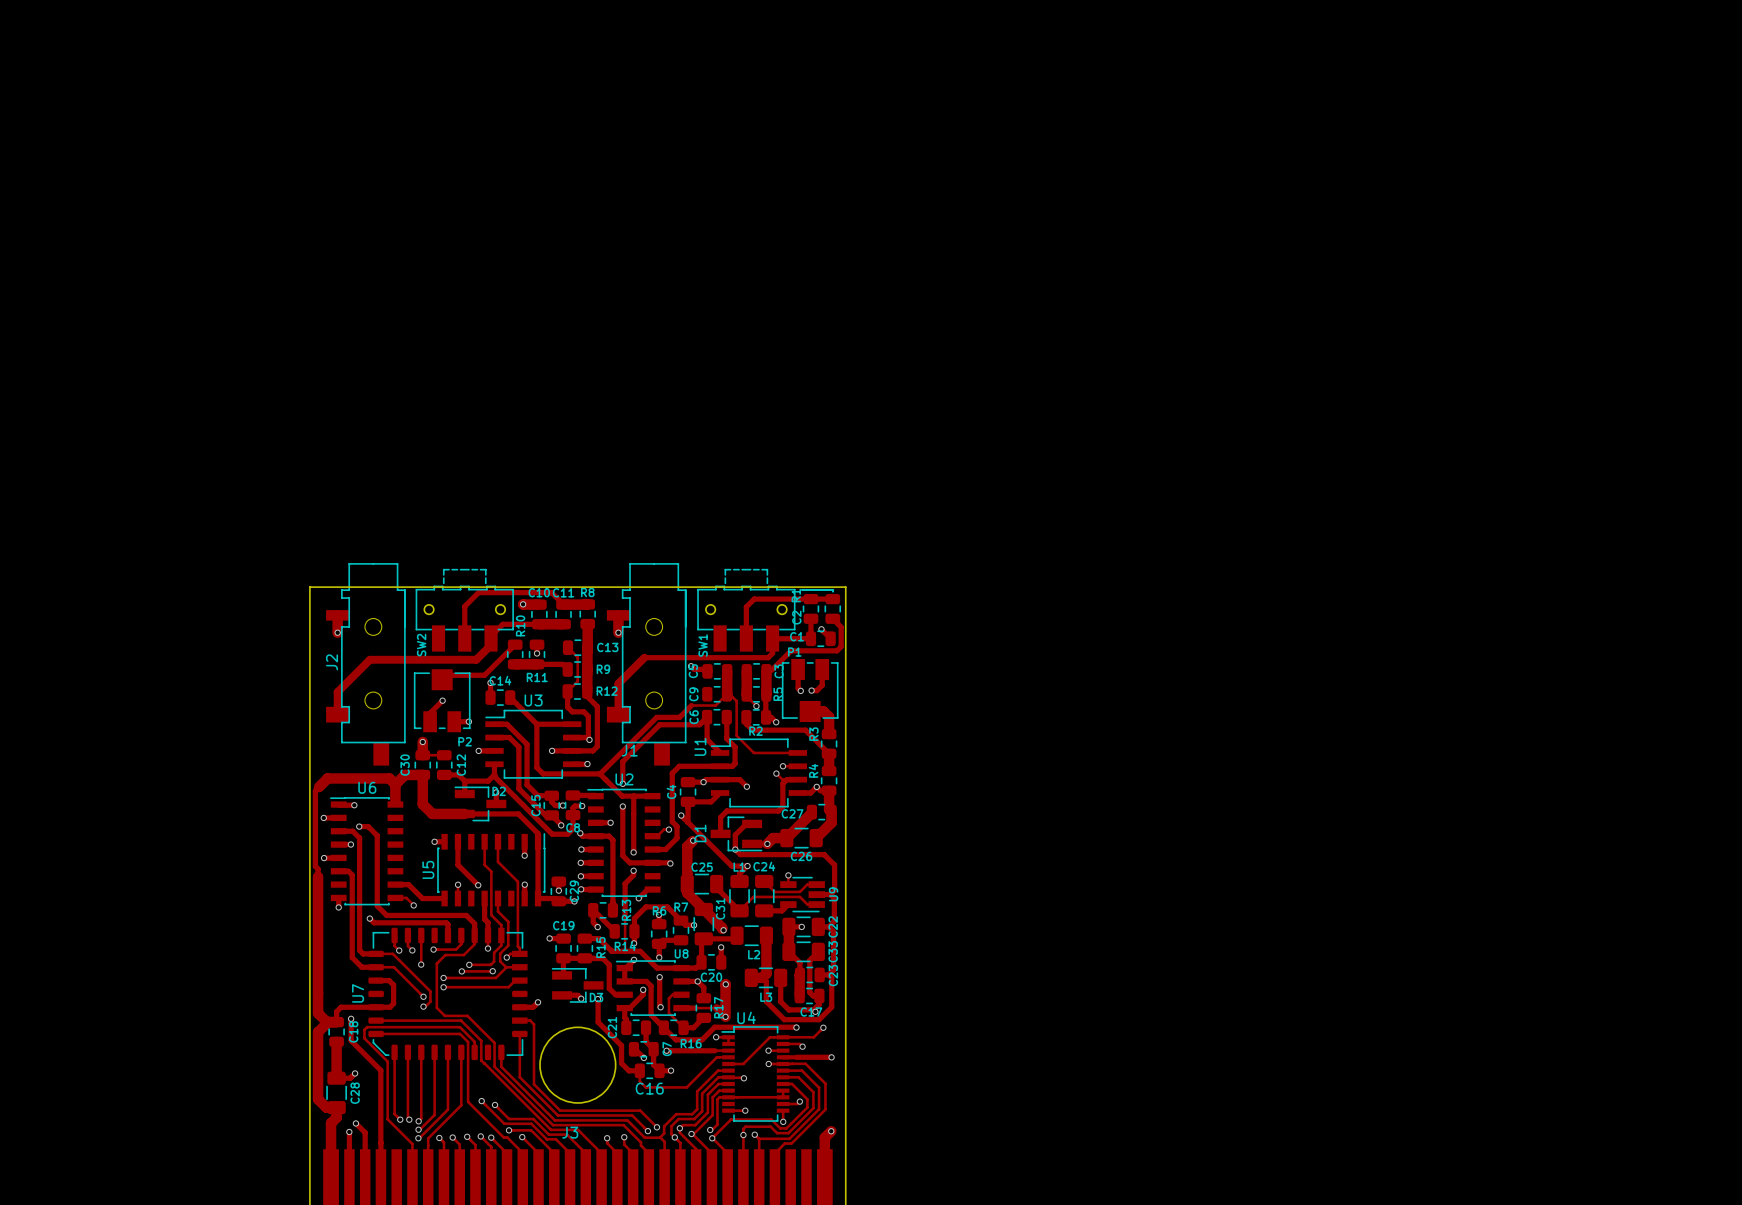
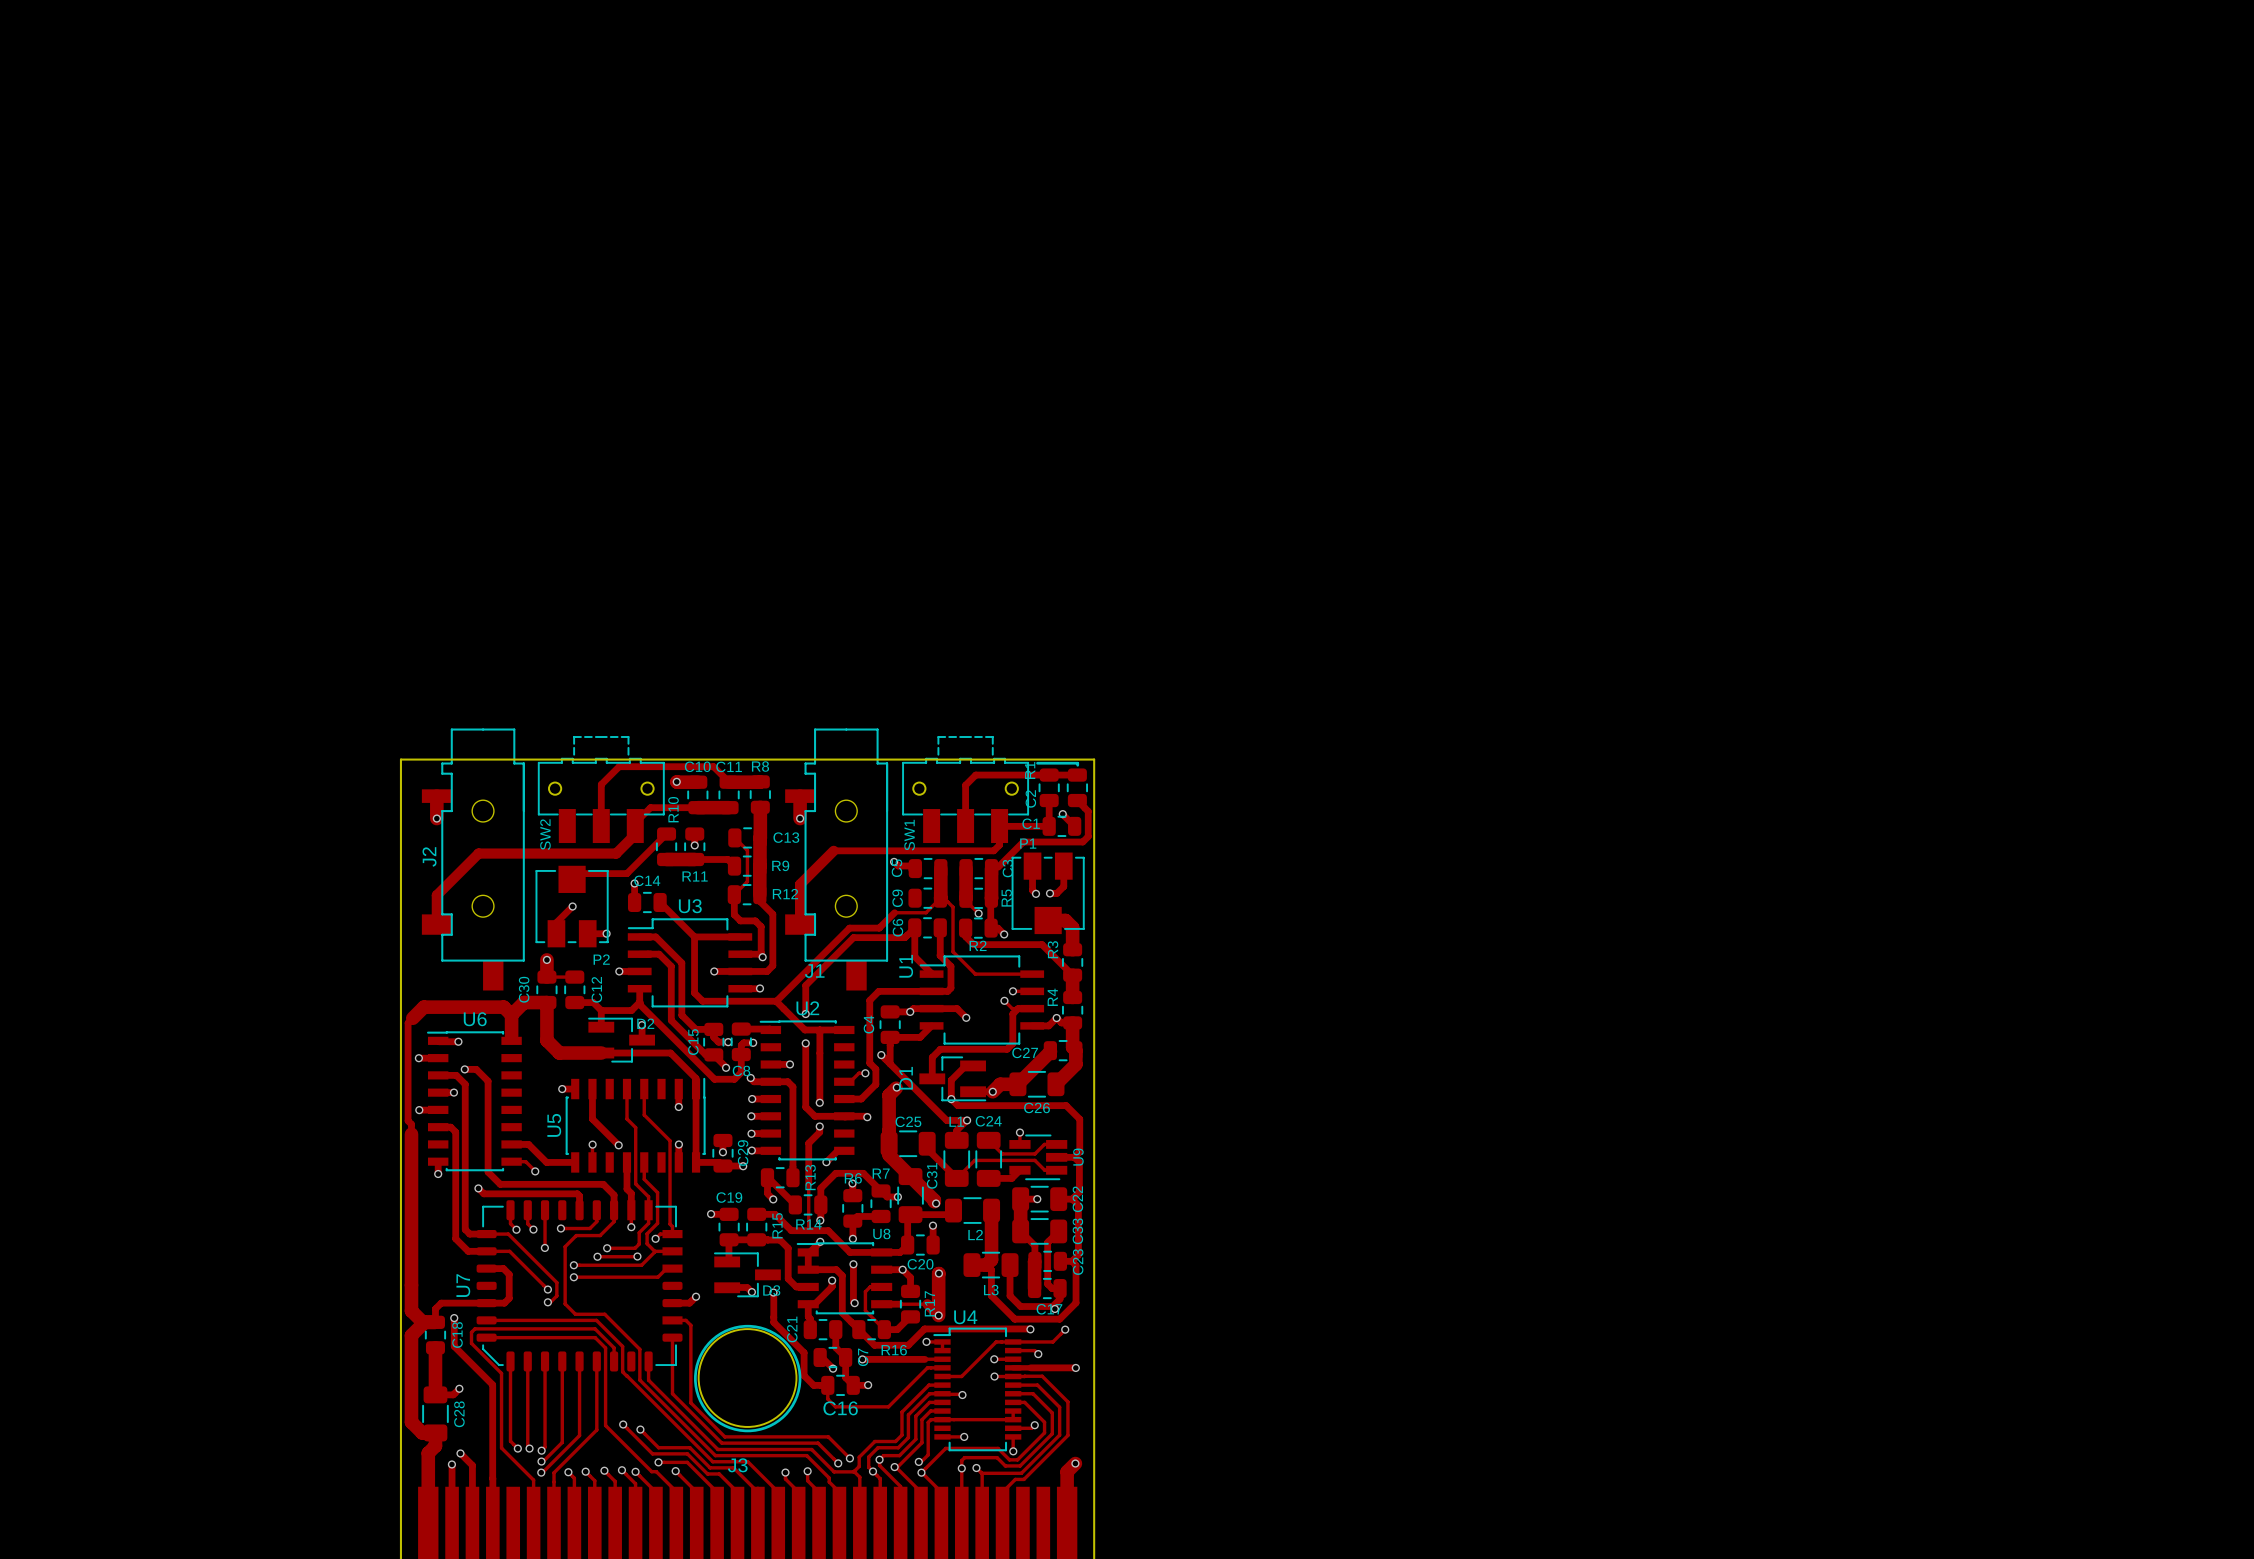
drawing: none -> [694, 1324, 802, 1433]

